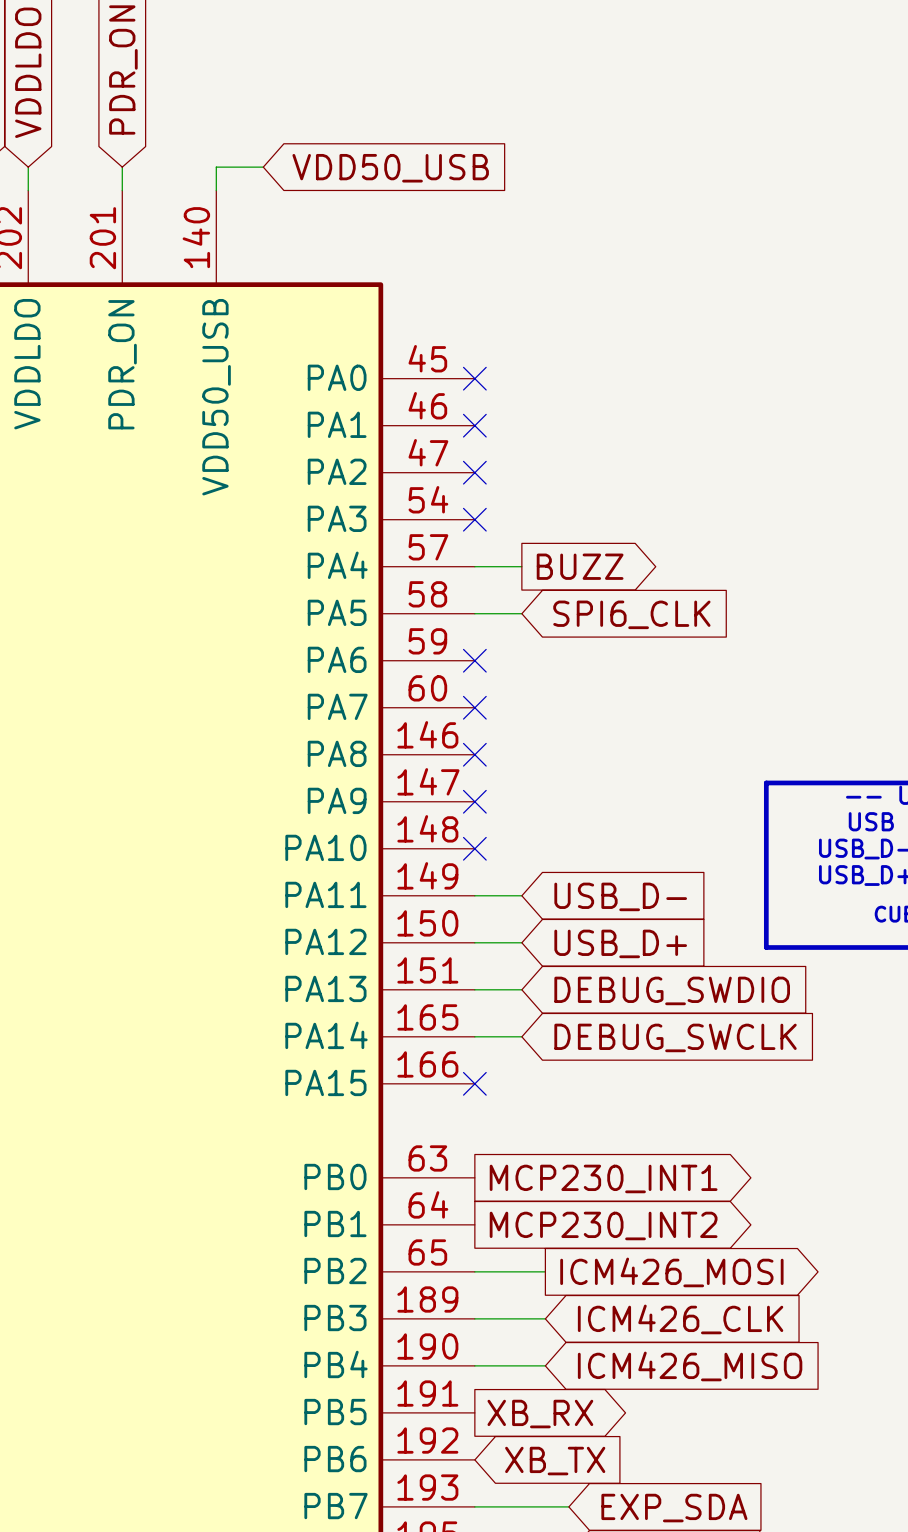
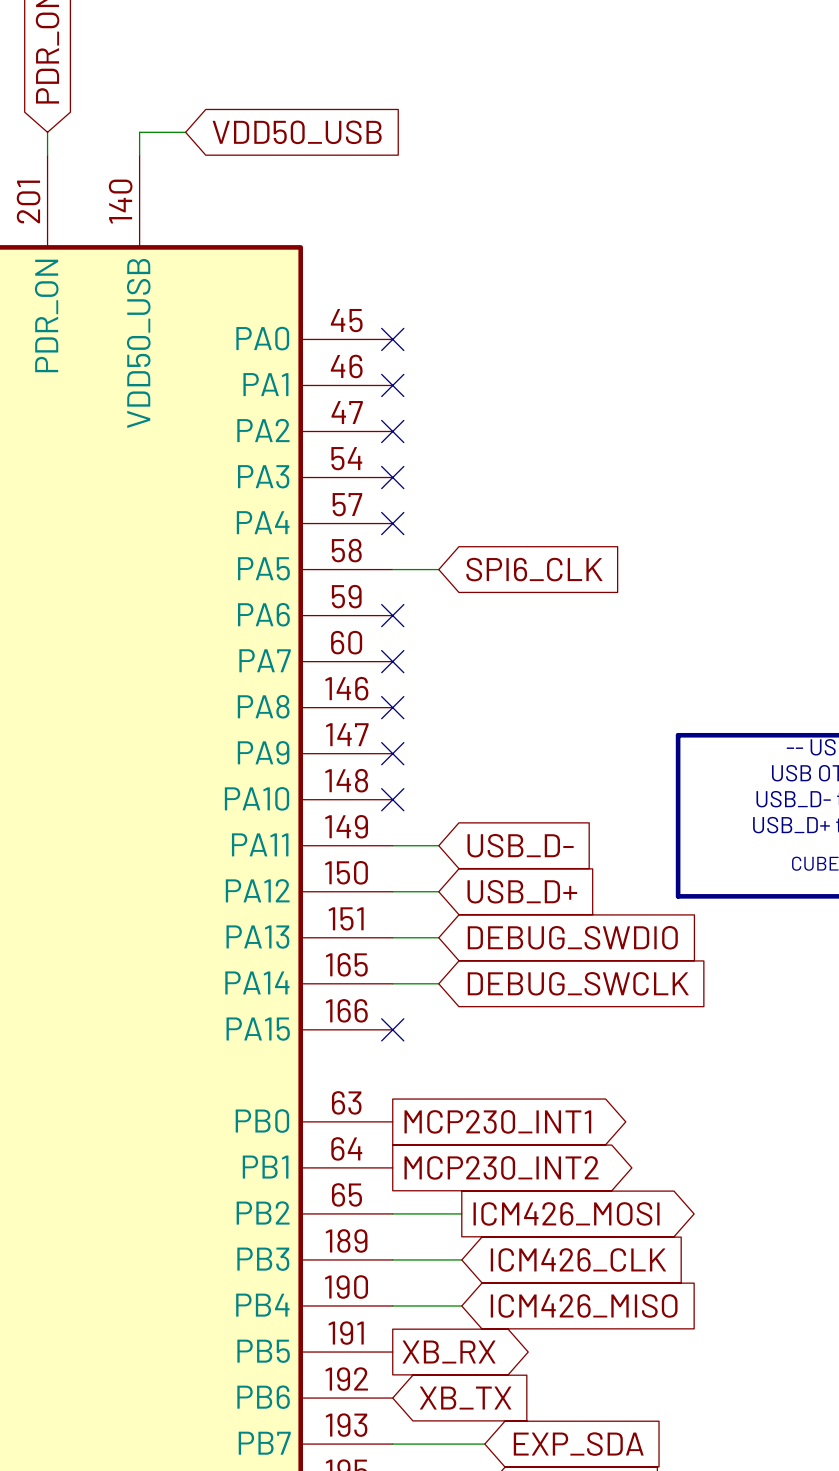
wire: (474, 566) (521, 566) -> none
no-connect mark: none -> (392, 523)
global label: BUZZ (580, 566) -> none

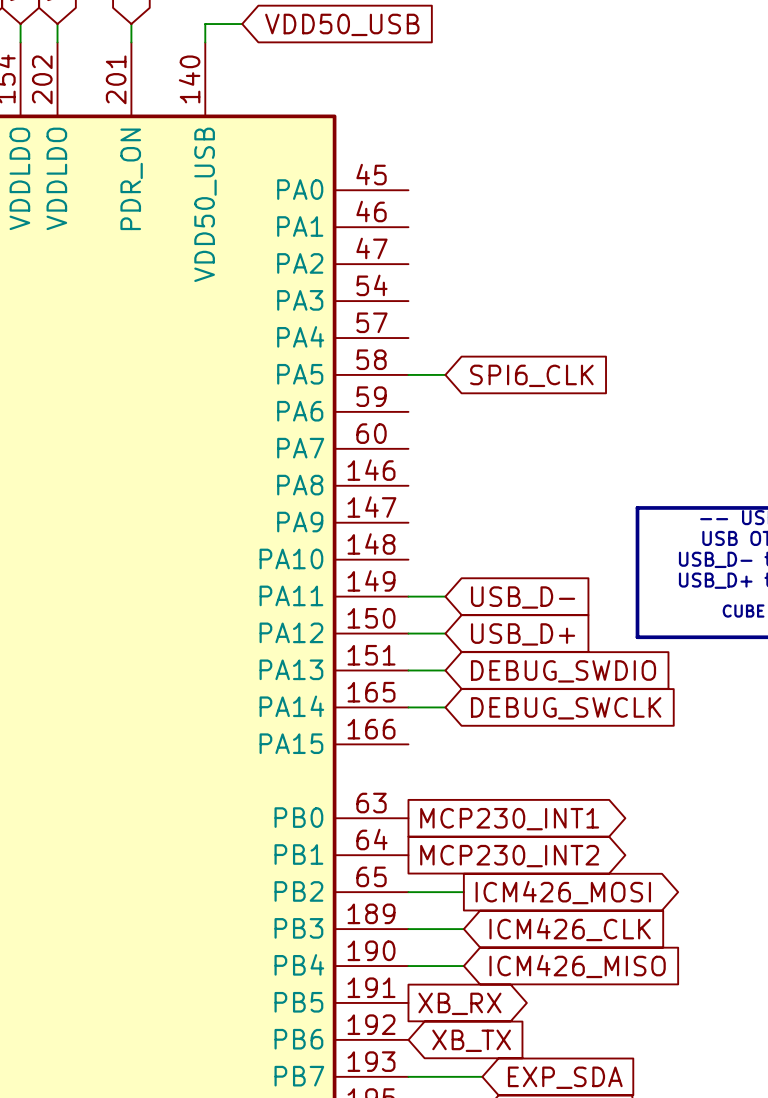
no-connect mark: (392, 339) -> none
no-connect mark: (392, 385) -> none
no-connect mark: (392, 431) -> none
no-connect mark: (392, 477) -> none
no-connect mark: (392, 523) -> none
no-connect mark: (392, 615) -> none
no-connect mark: (392, 661) -> none
no-connect mark: (392, 707) -> none
no-connect mark: (392, 753) -> none
no-connect mark: (392, 799) -> none
no-connect mark: (392, 1029) -> none

